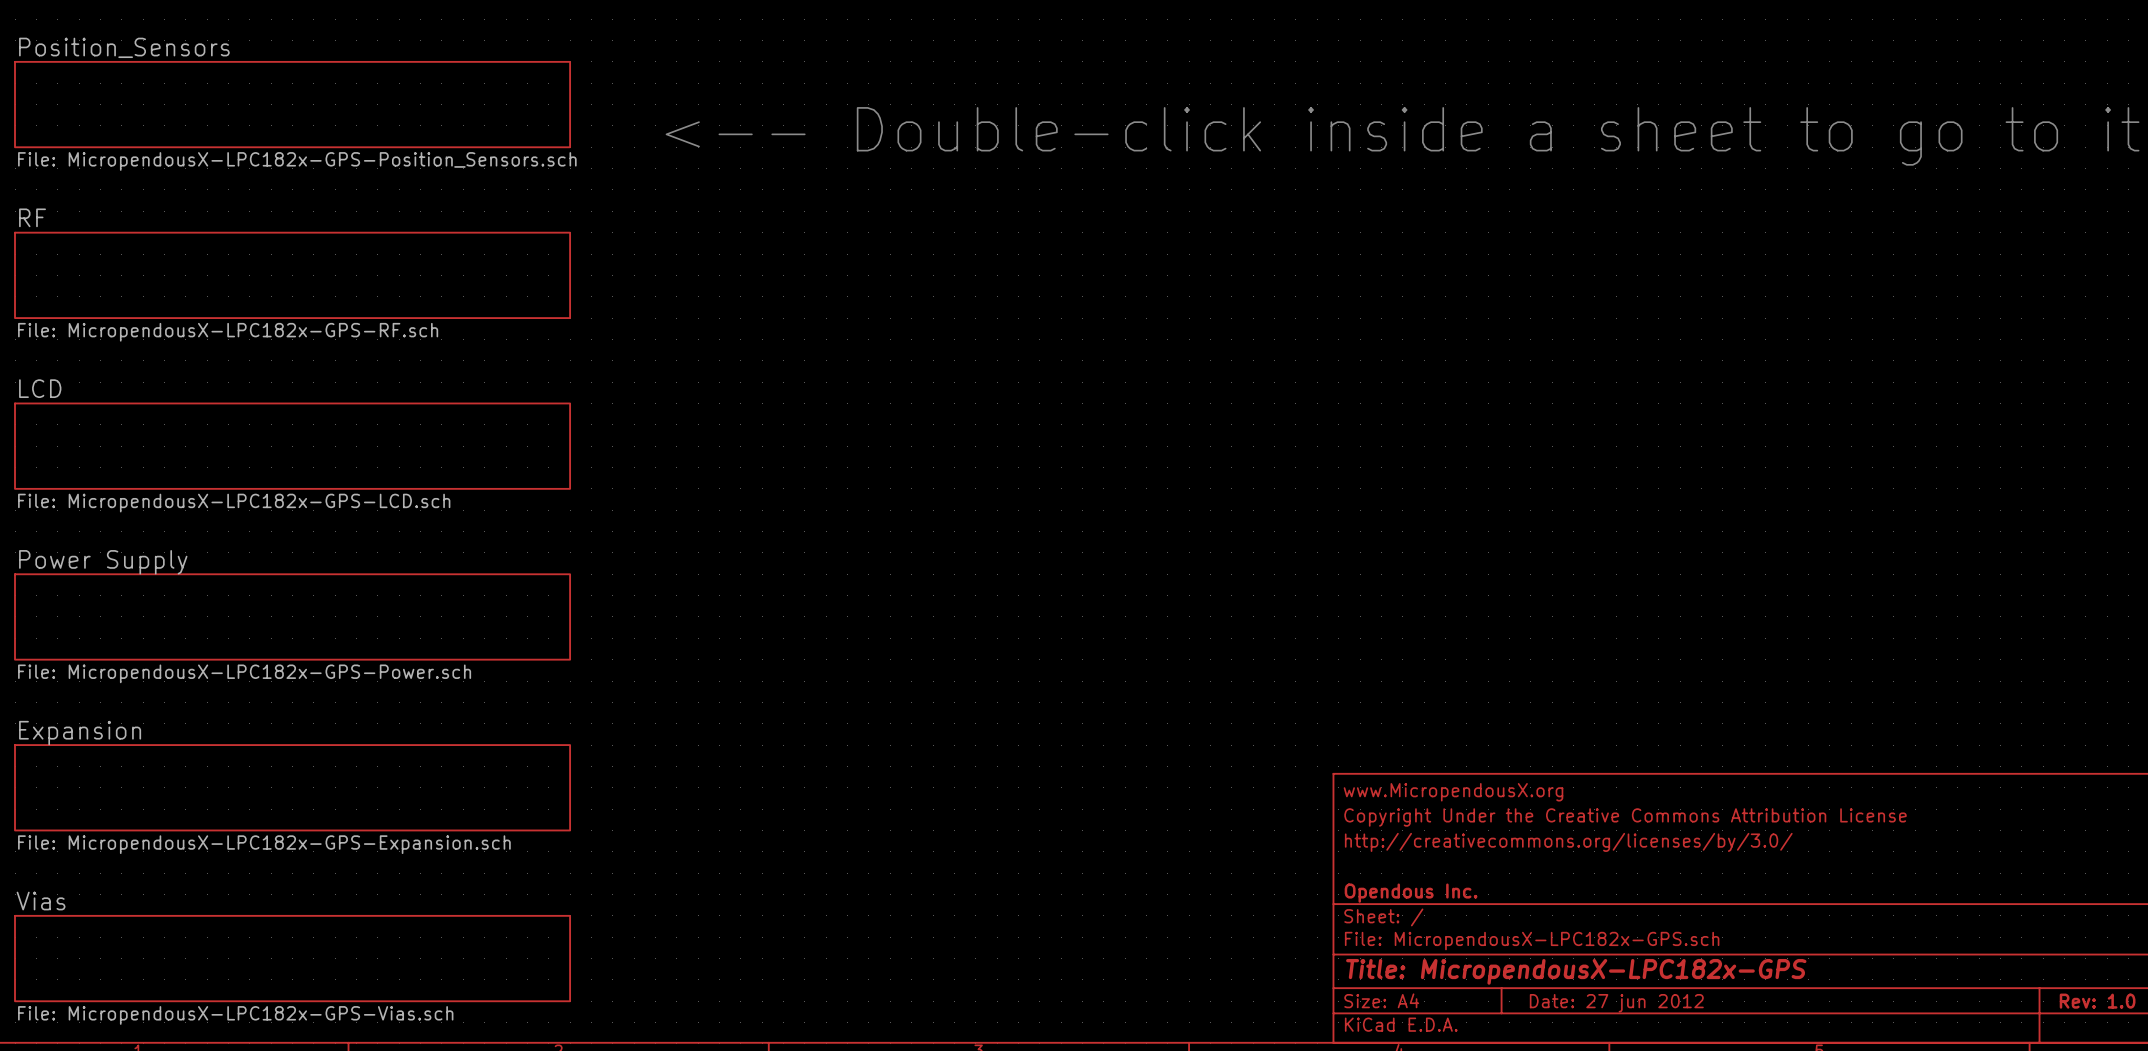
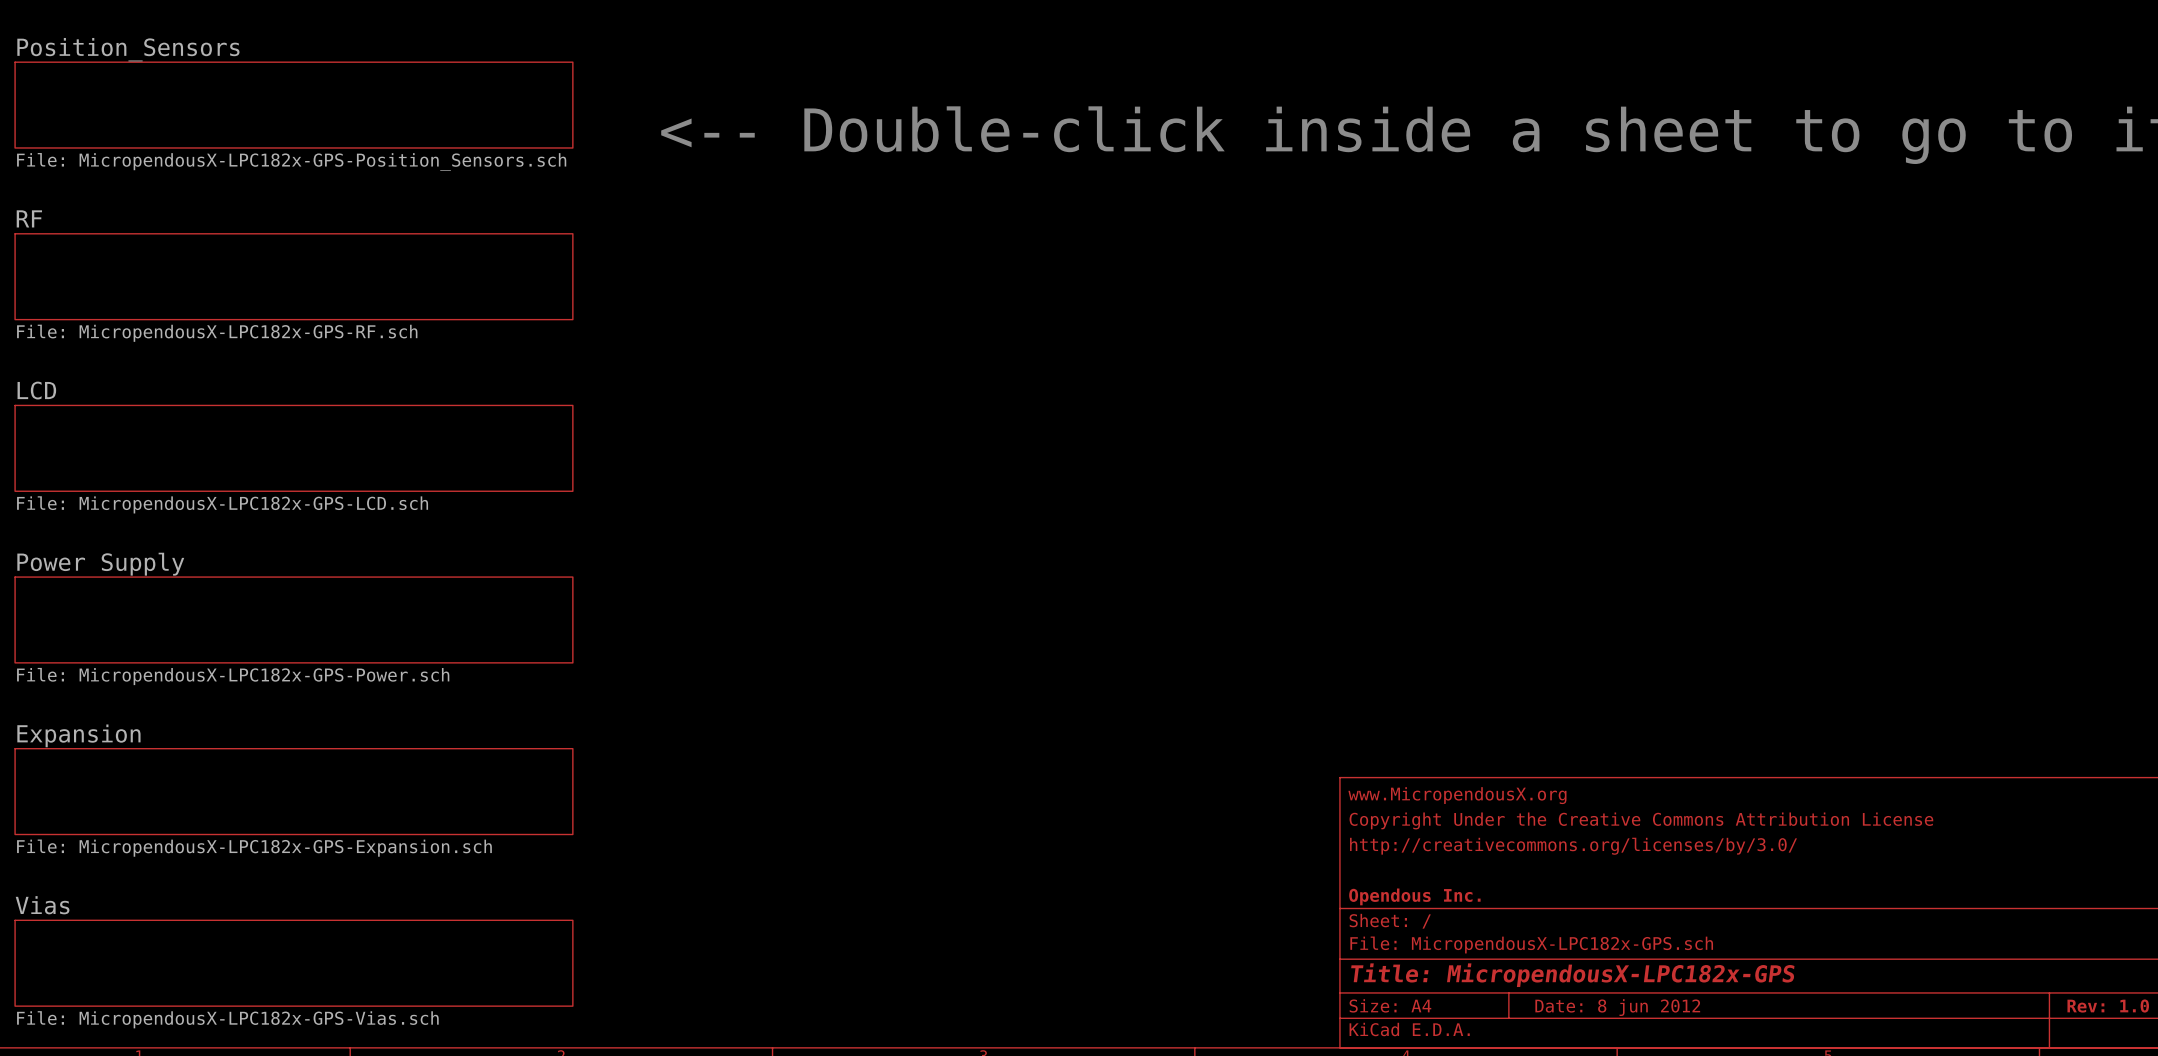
title block: Date: 27 jun 2012 (1616, 1003) -> Date: 8 jun 2012 (1617, 1007)

